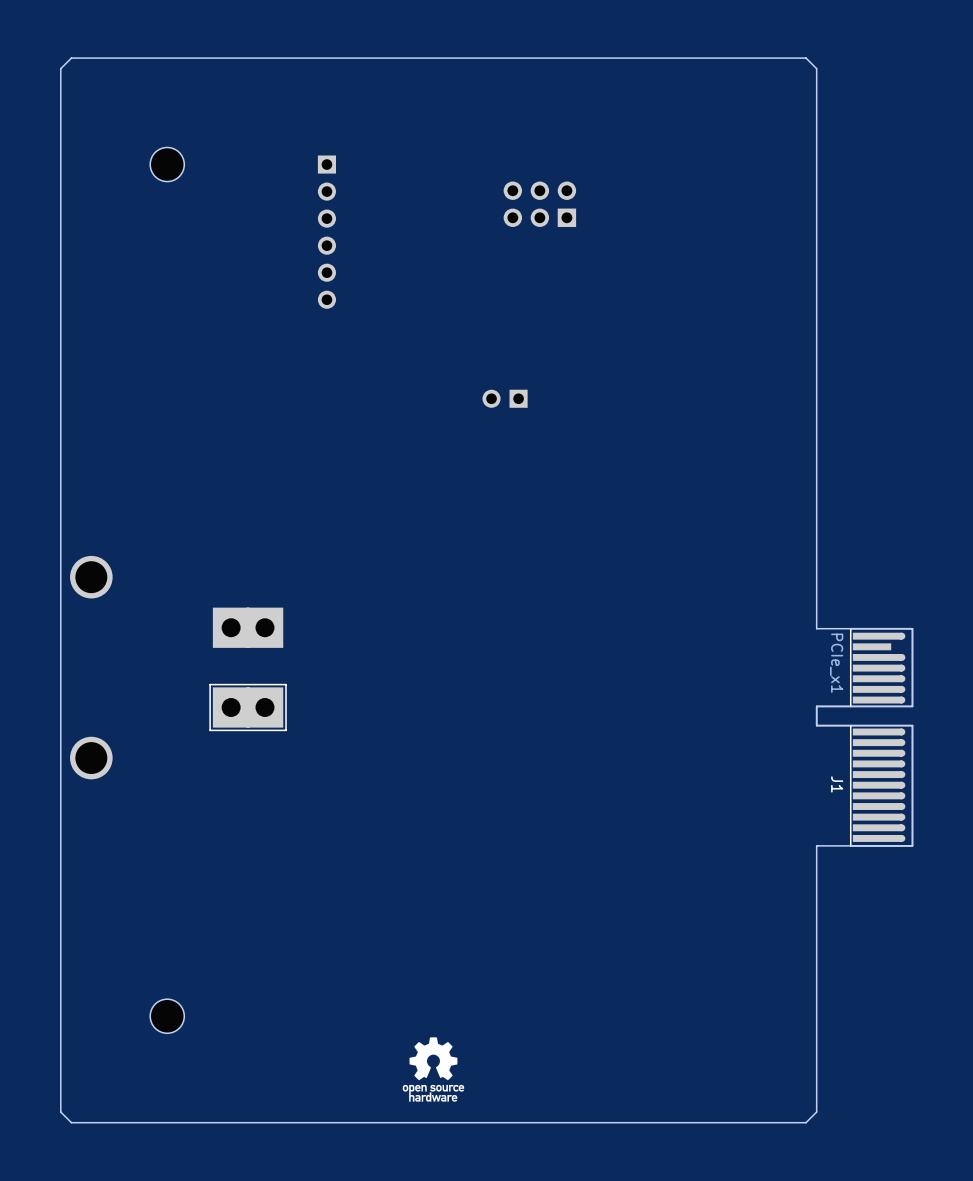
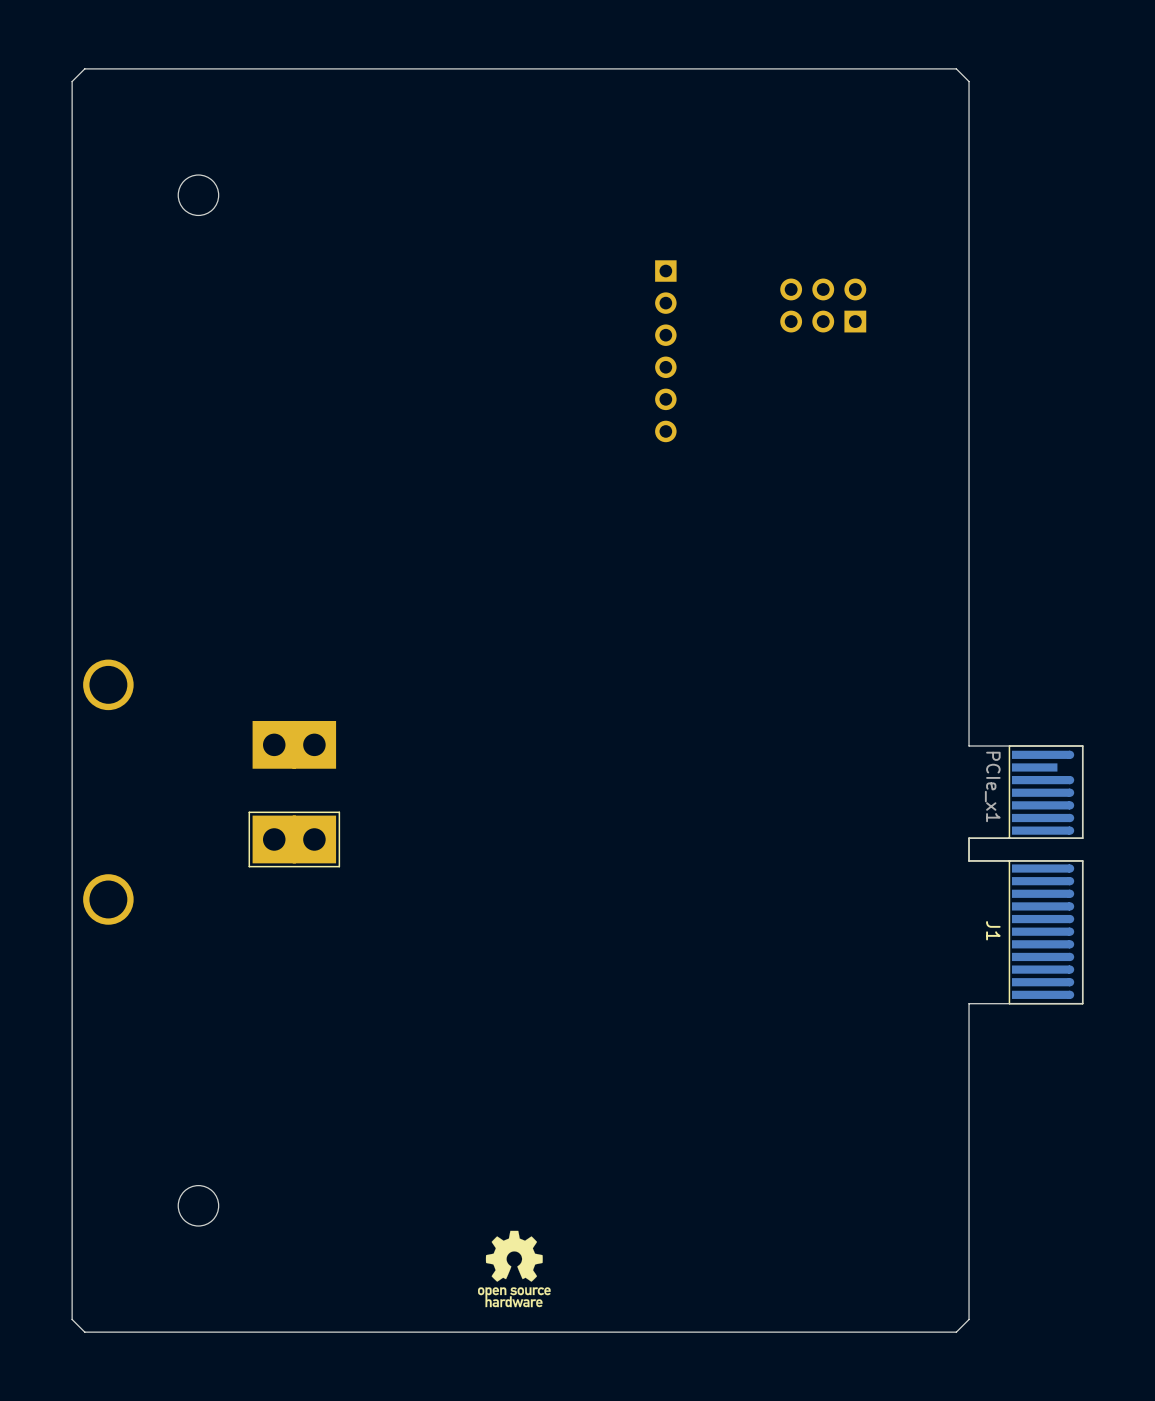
part position: (539, 204) -> (823, 305)
part position: (326, 232) -> (665, 351)
part: (505, 398) -> none

